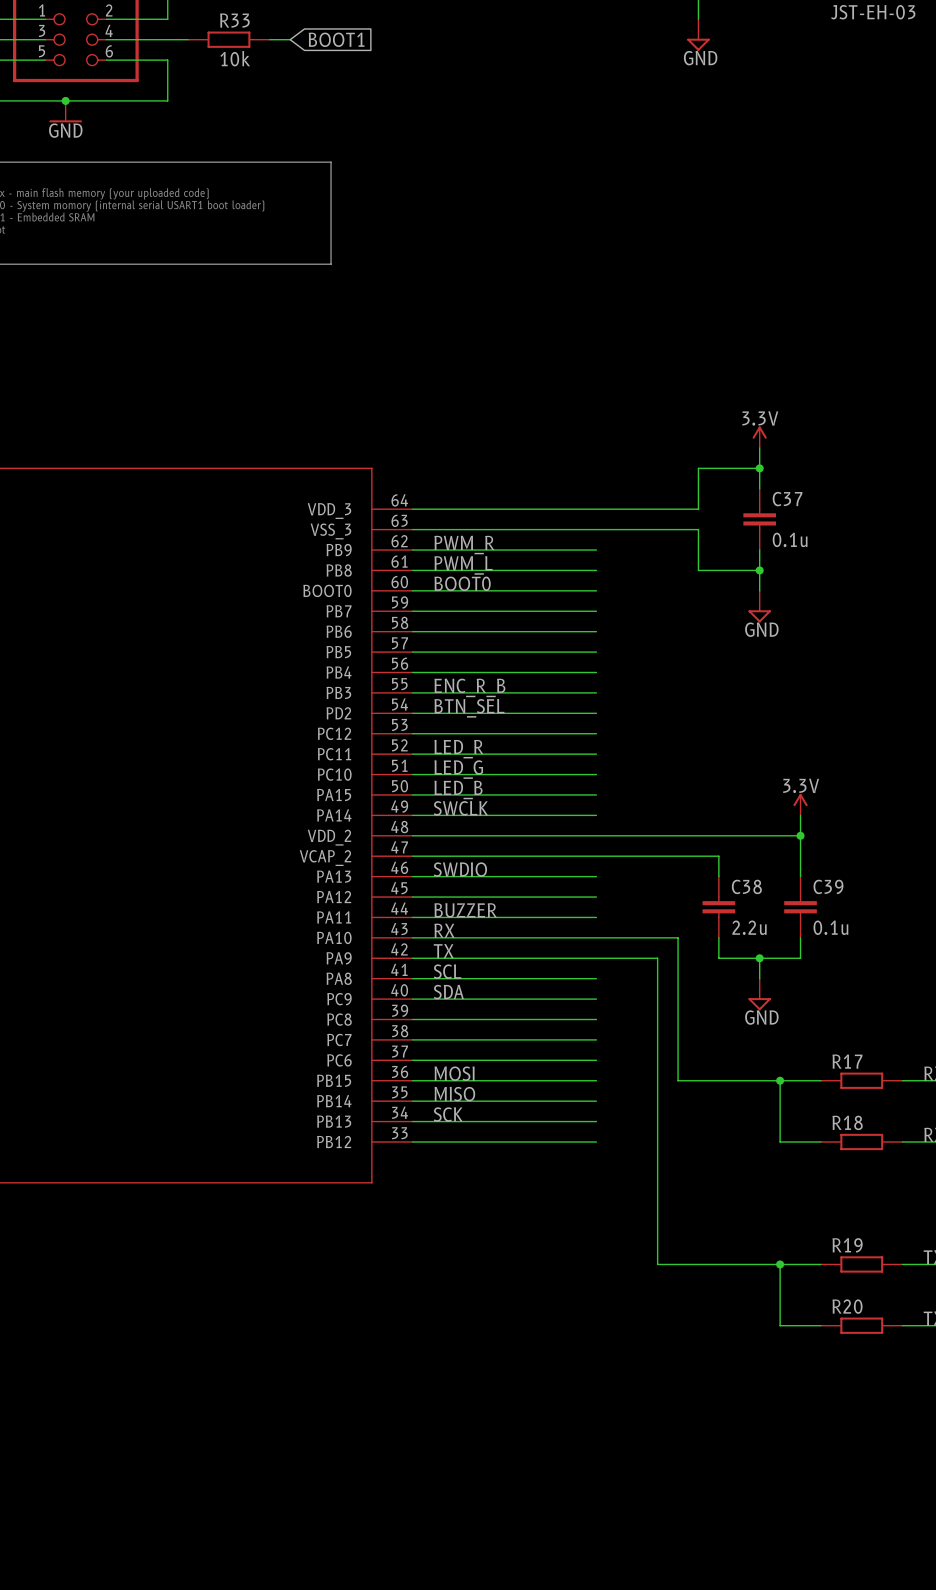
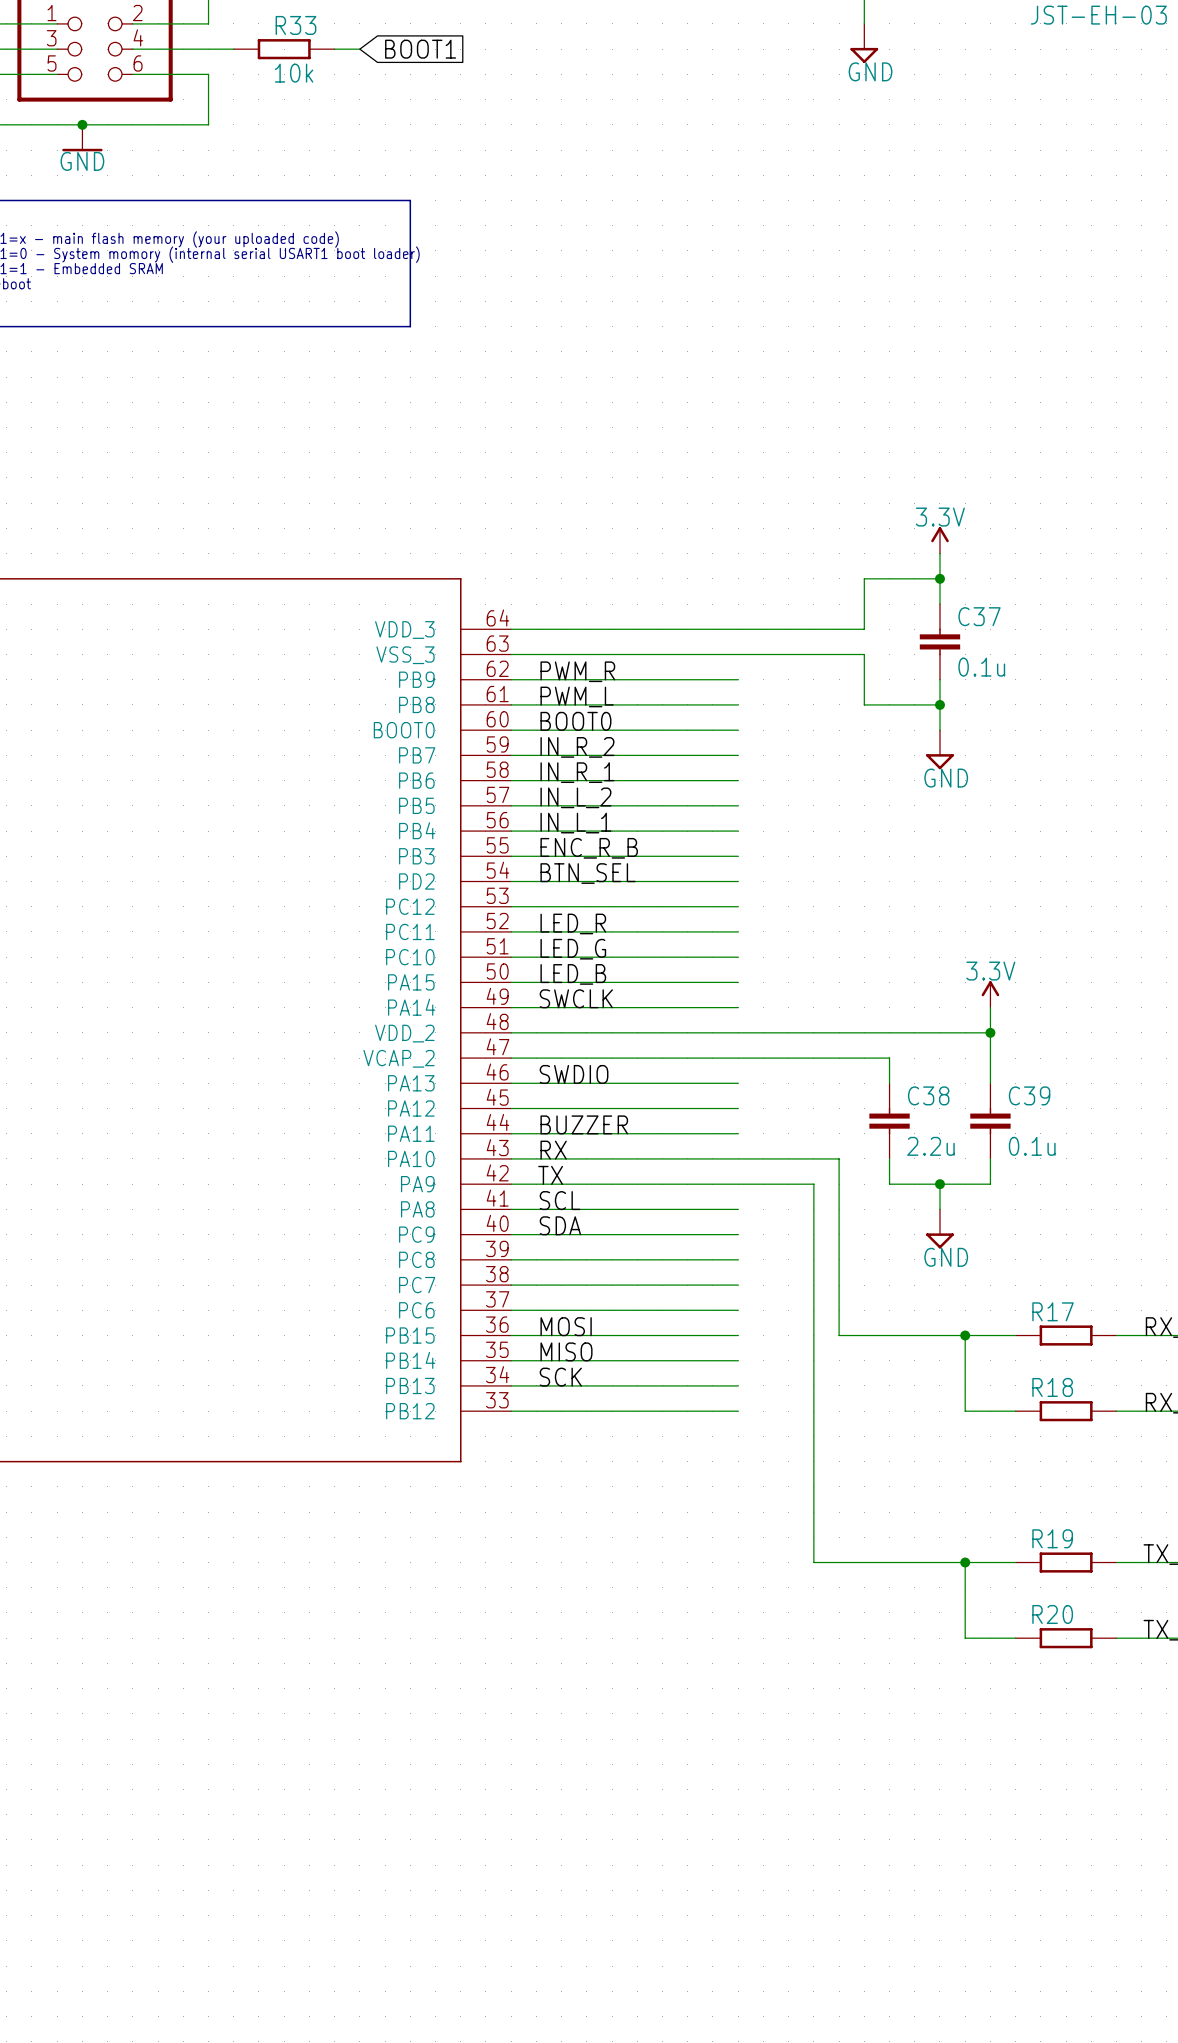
label: none -> IN_R_2 (577, 747)
label: none -> IN_R_1 (577, 772)
label: none -> IN_L_2 (575, 797)
label: none -> IN_L_1 (575, 823)

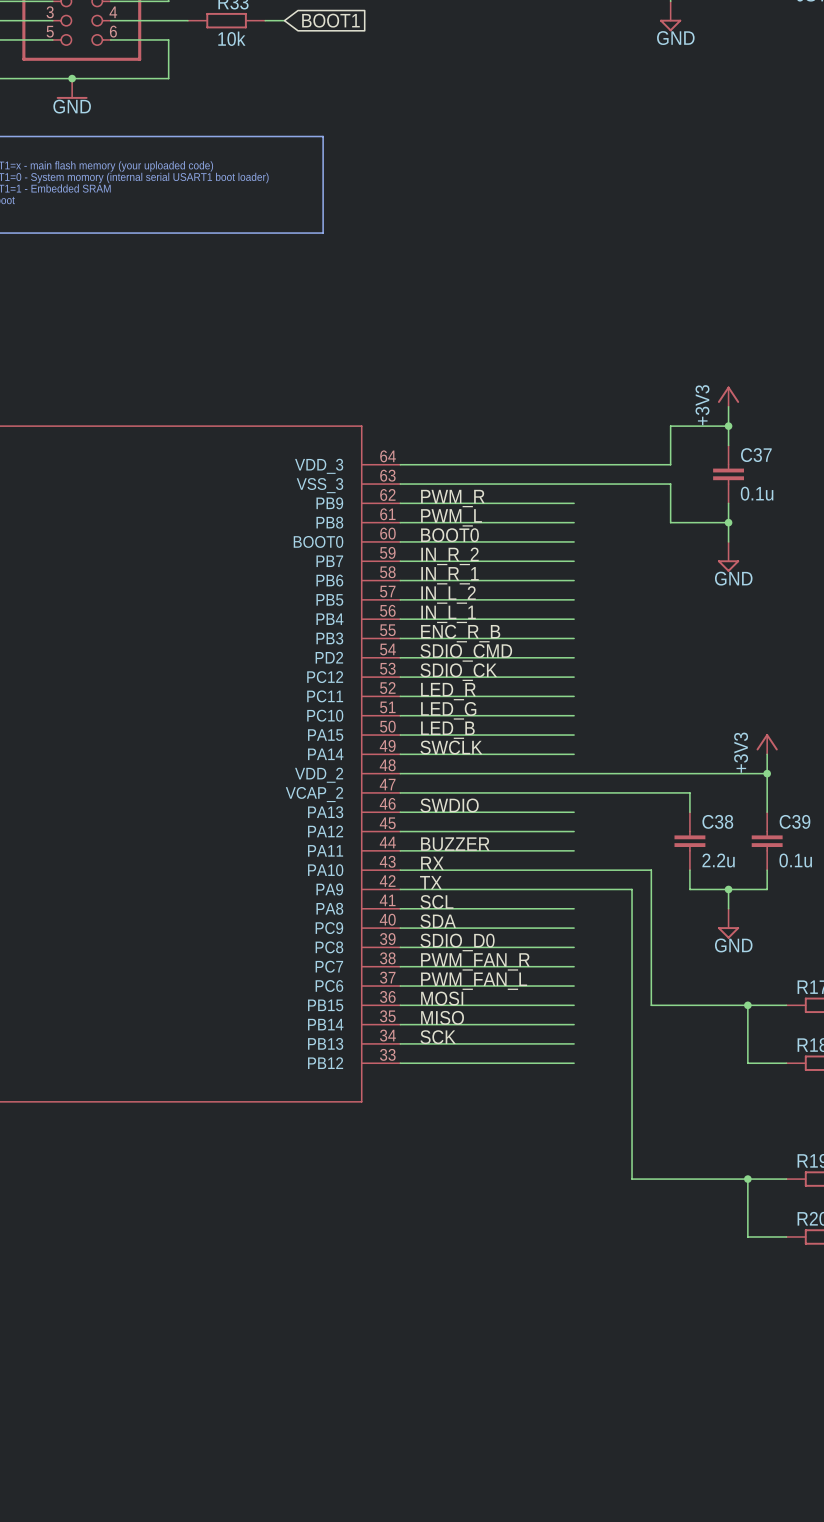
power symbol: 3.3V (939, 540) -> +3V3 (728, 396)
label: BTN_SEL (588, 873) -> SDIO_CMD (466, 652)
label: none -> SDIO_CK (458, 672)
power symbol: 3.3V (990, 994) -> +3V3 (767, 744)
label: none -> SDIO_D0 (457, 942)
label: none -> PWM_FAN_R (475, 961)
label: none -> PWM_FAN_L (474, 981)

